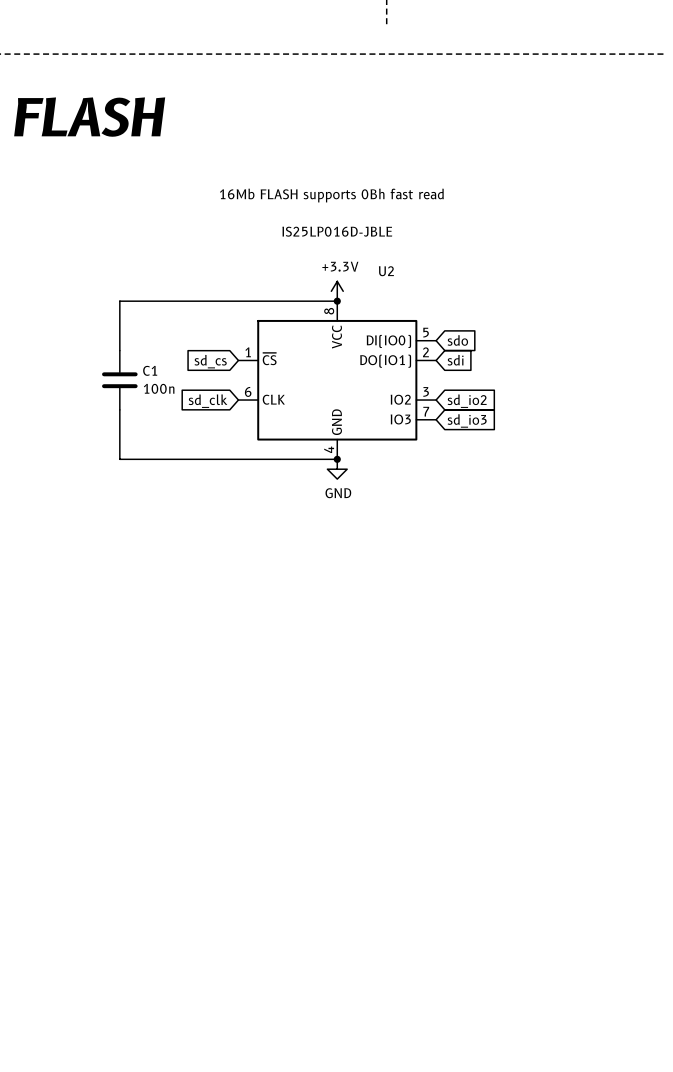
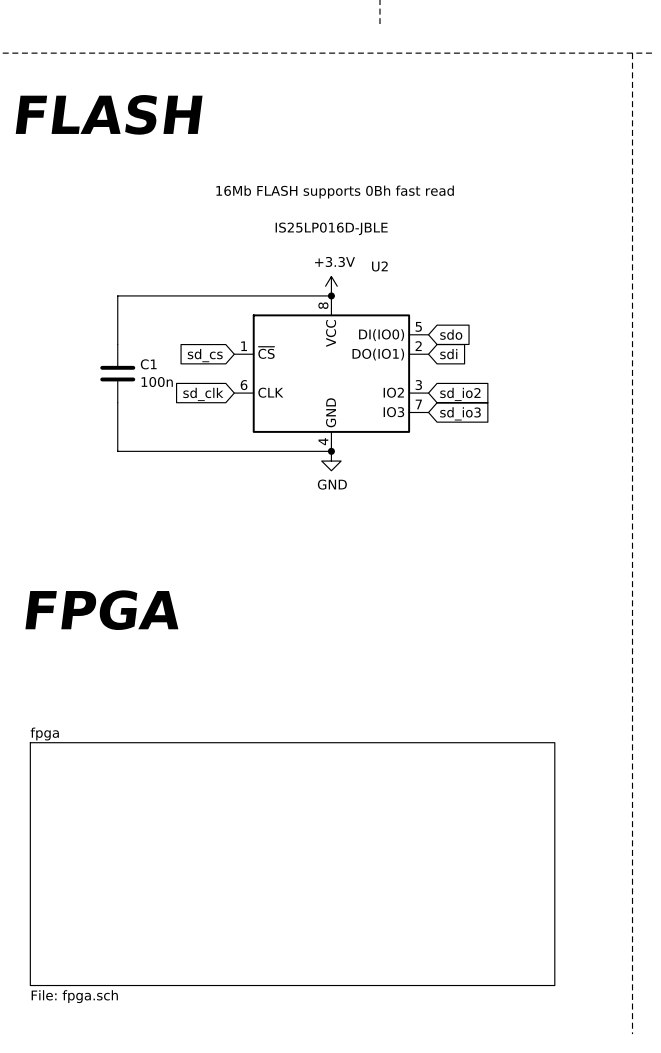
line: none -> (632, 53) (632, 1034)
text: none -> FPGA (101, 610)
sheet fpga: none -> File: fpga.sch (292, 864)

